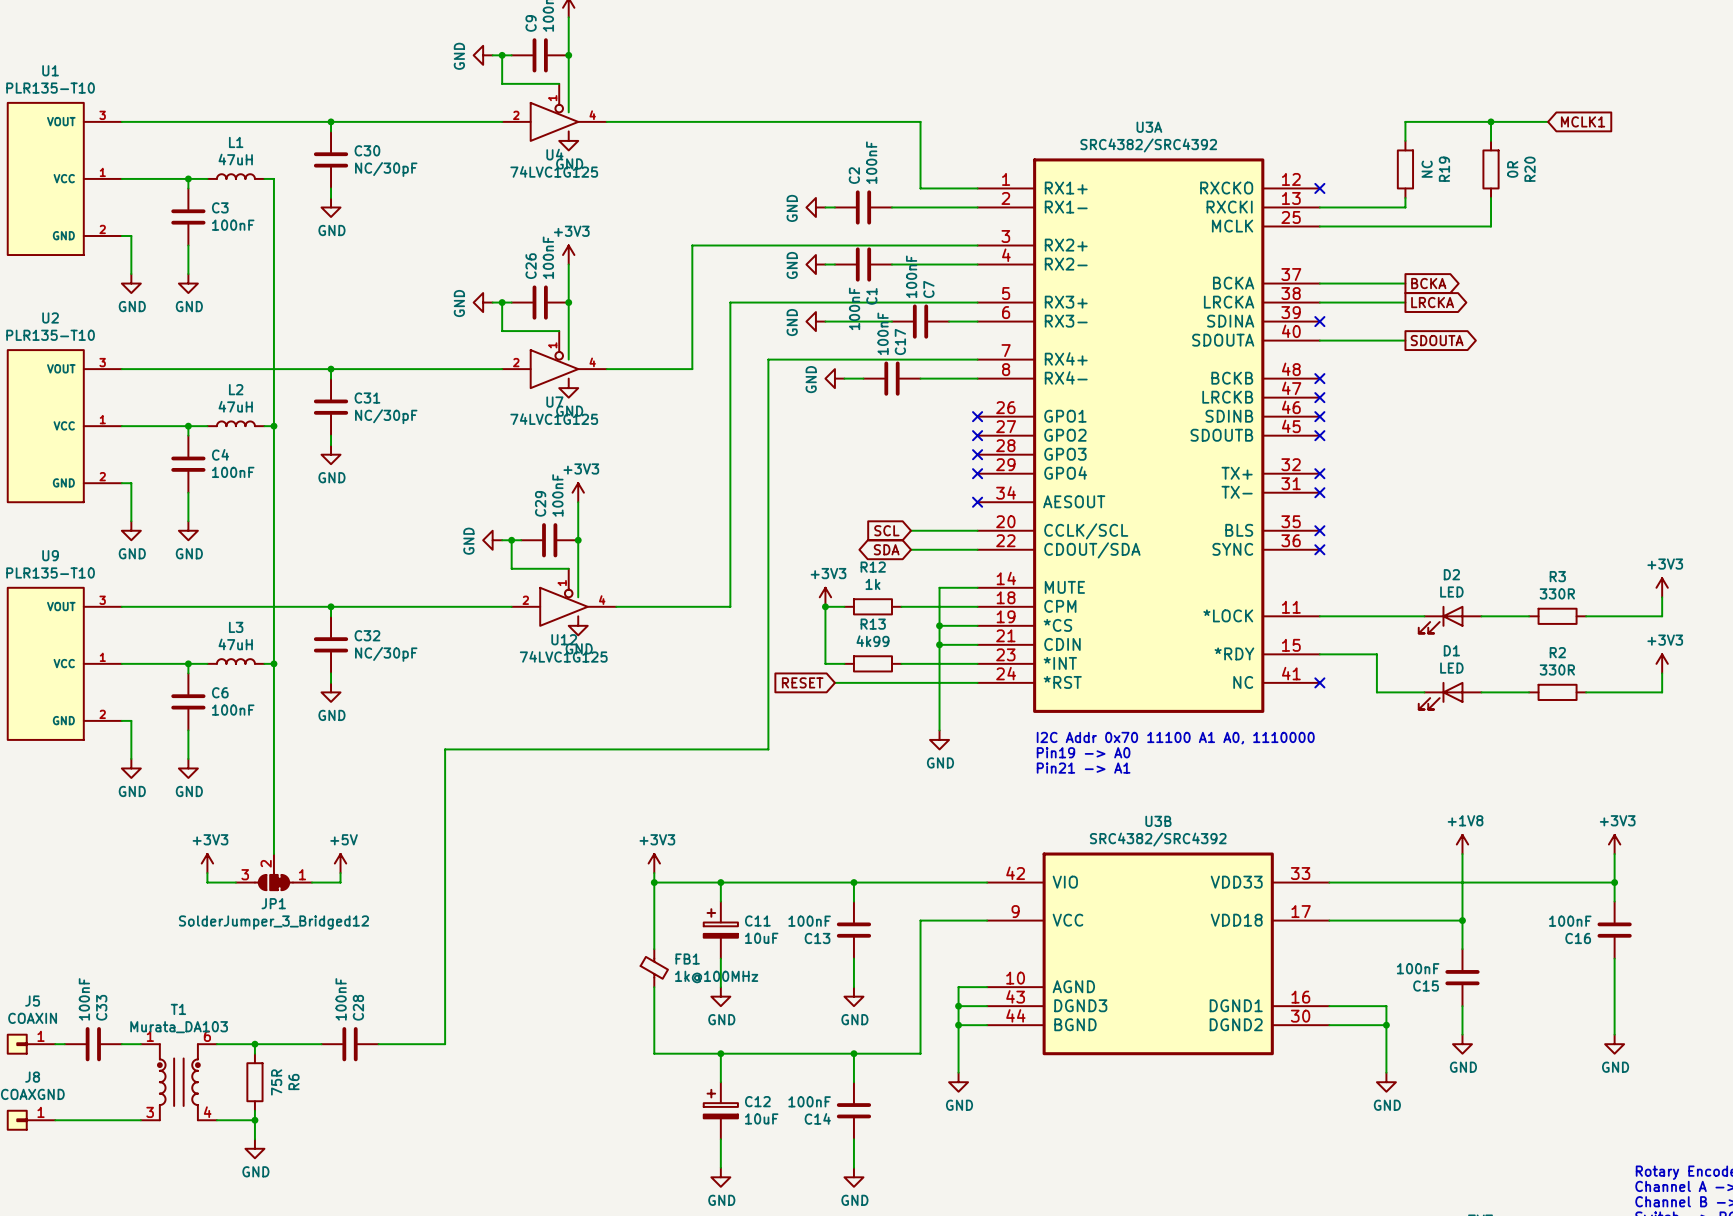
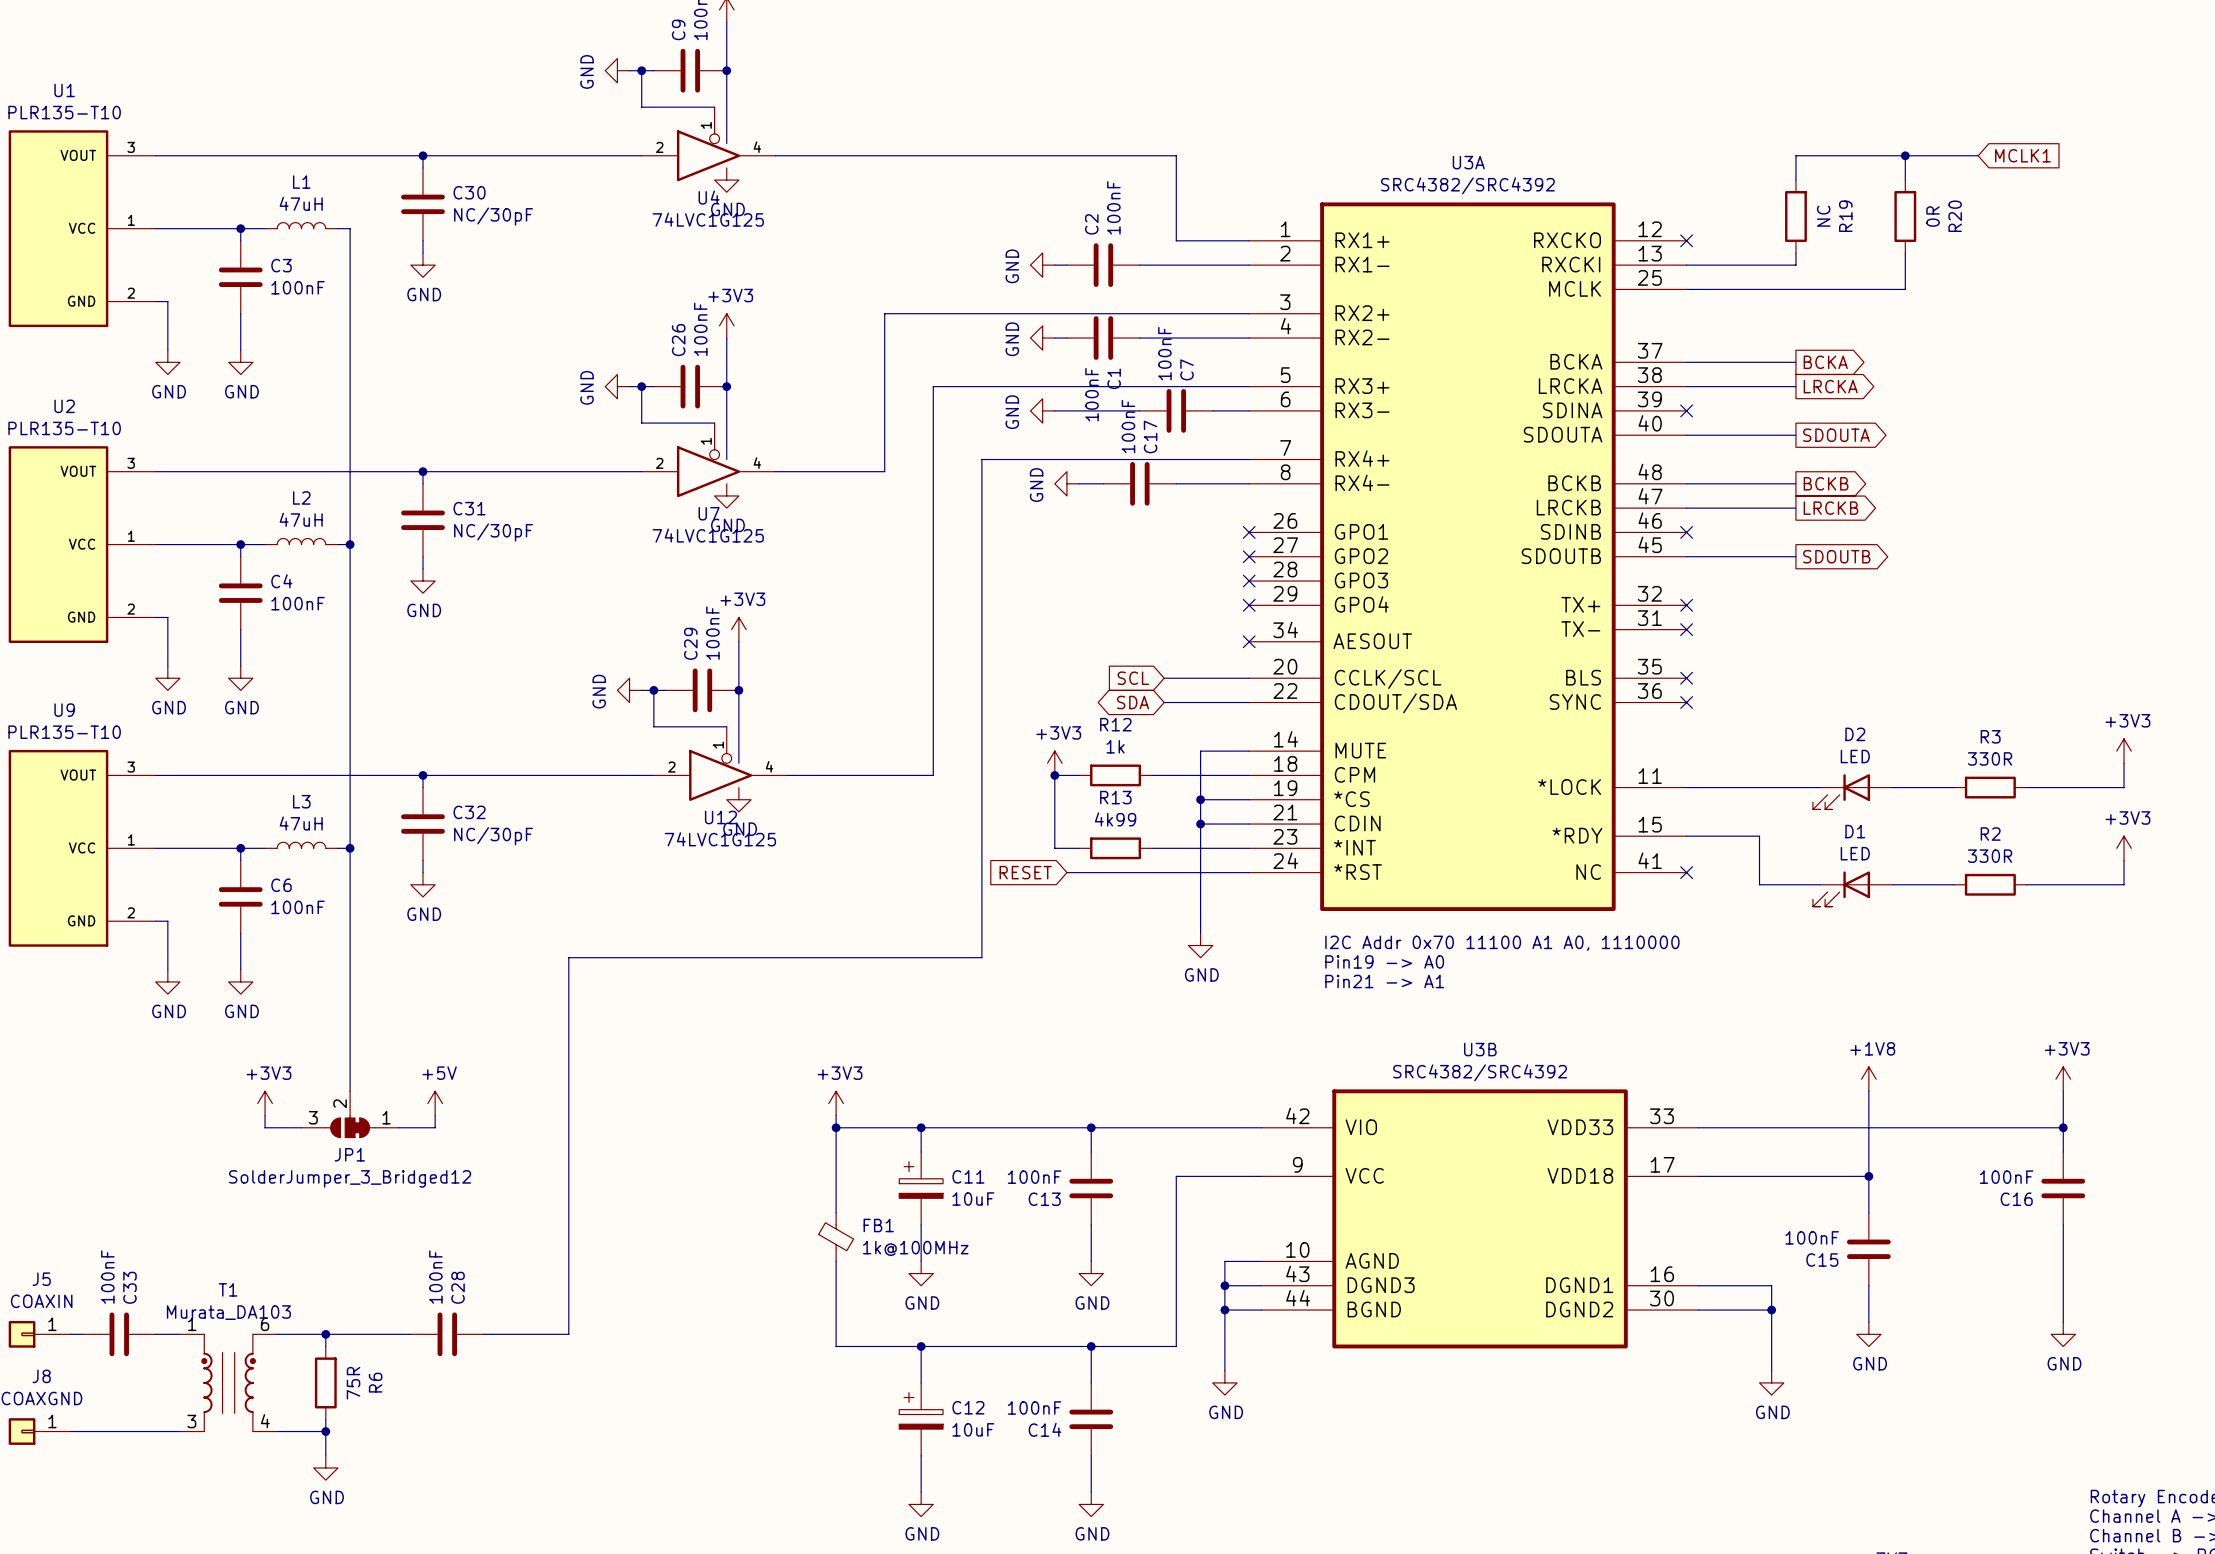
wire: none -> (1686, 483) (1795, 483)
no-connect mark: (1319, 378) -> none
global label: none -> BCKB (1826, 483)
wire: none -> (1686, 508) (1795, 508)
no-connect mark: (1319, 397) -> none
global label: none -> LRCKB (1830, 508)
wire: none -> (1686, 556) (1795, 556)
no-connect mark: (1319, 435) -> none
global label: none -> SDOUTB (1836, 556)

